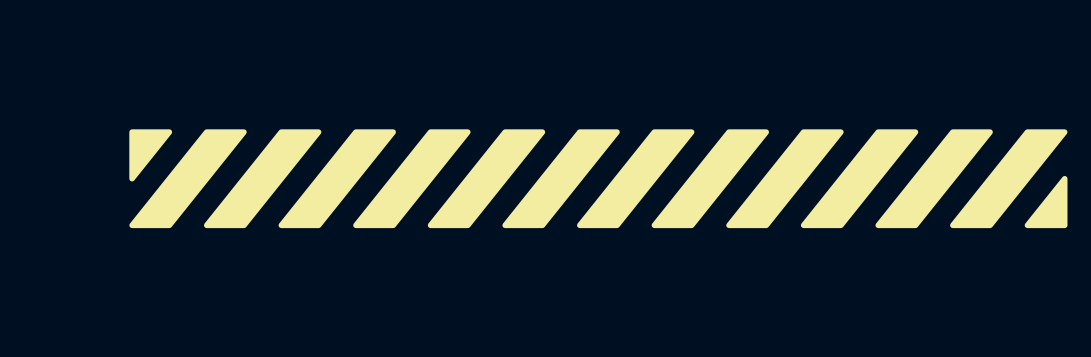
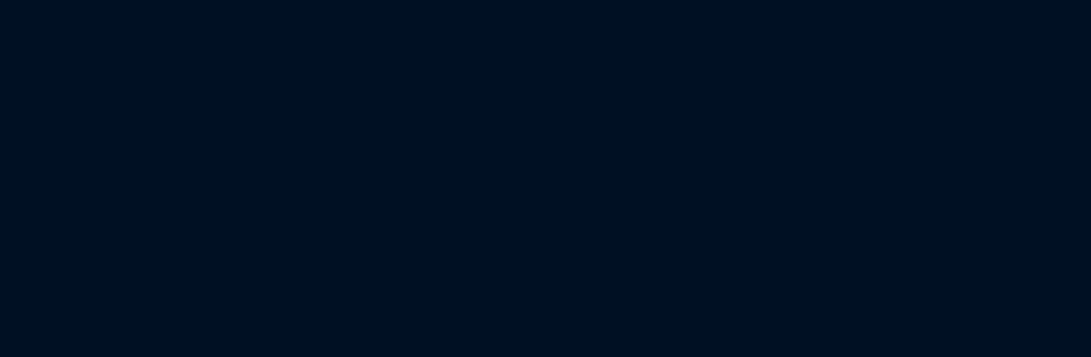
drawing: [129, 129, 1068, 229] -> none

